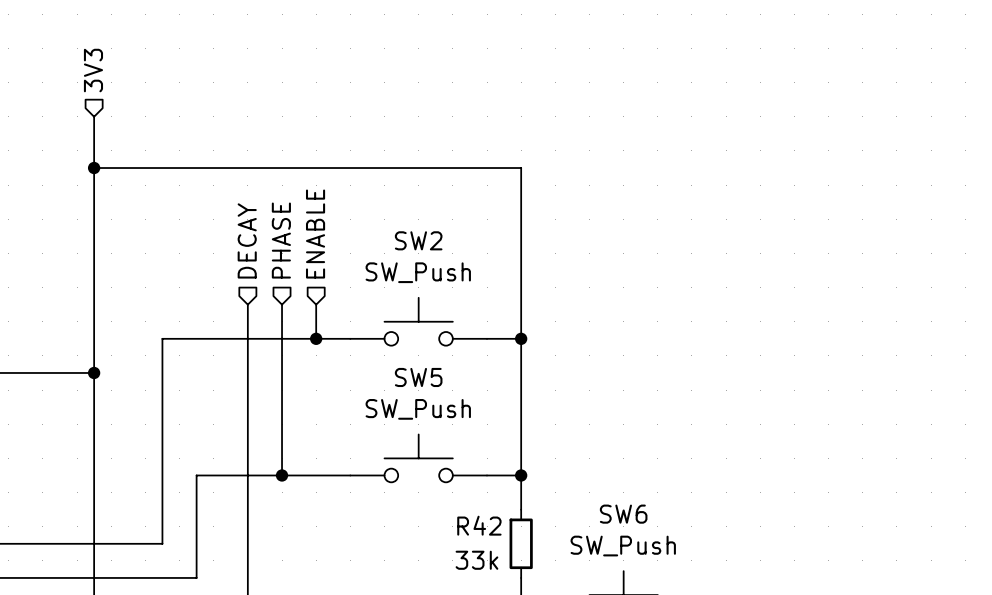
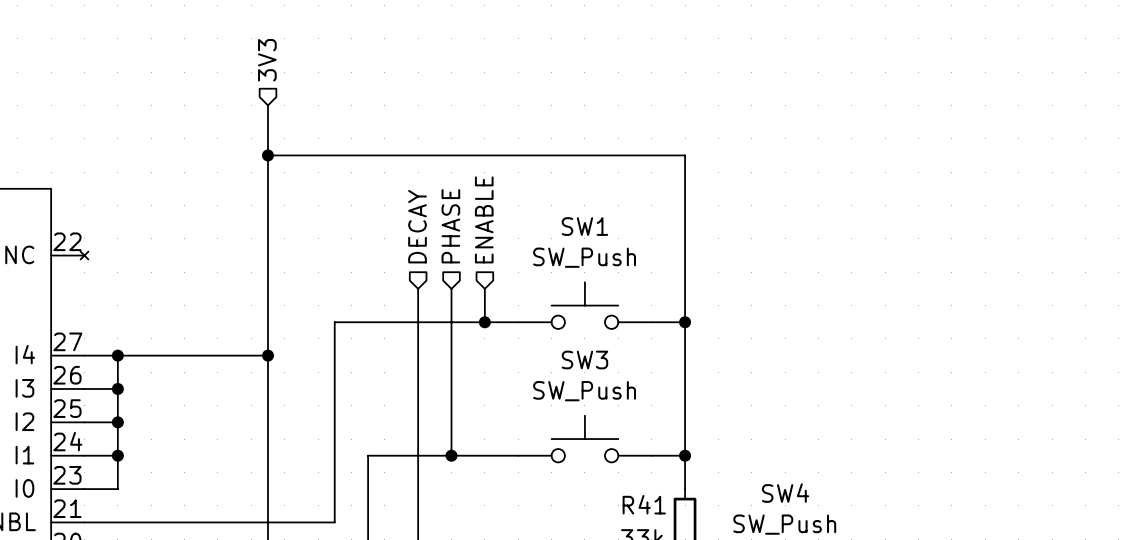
SW2 name: SW2 (418, 240) -> SW1 (584, 226)
SW5 name: SW5 (418, 377) -> SW3 (584, 360)
SW6 name: SW6 (623, 514) -> SW4 (785, 493)
R42 name: R42 (479, 525) -> R41 (644, 504)

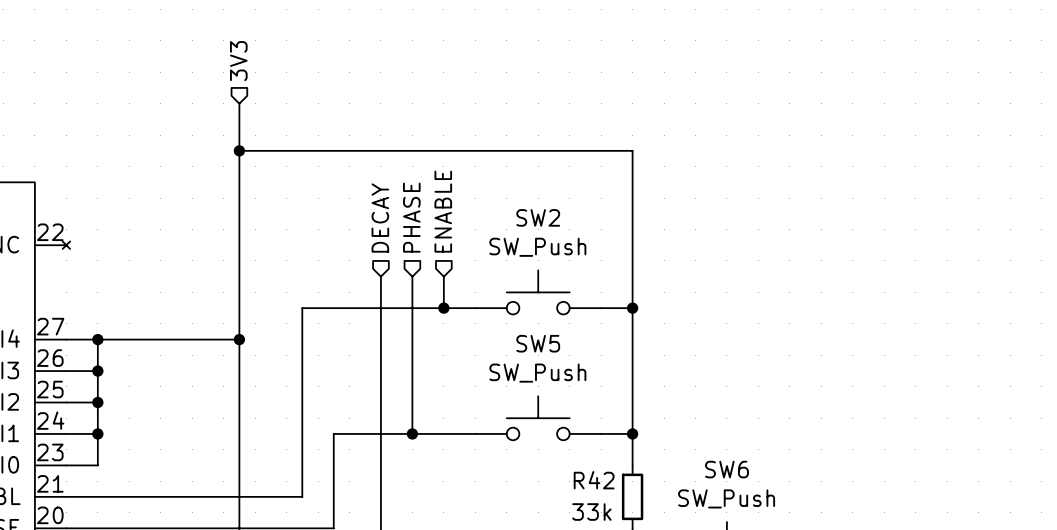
SW1 name: SW1 (584, 226) -> SW2 (538, 217)
SW3 name: SW3 (584, 360) -> SW5 (538, 343)
SW4 name: SW4 (785, 493) -> SW6 (726, 469)
R41 name: R41 (644, 504) -> R42 (594, 480)

